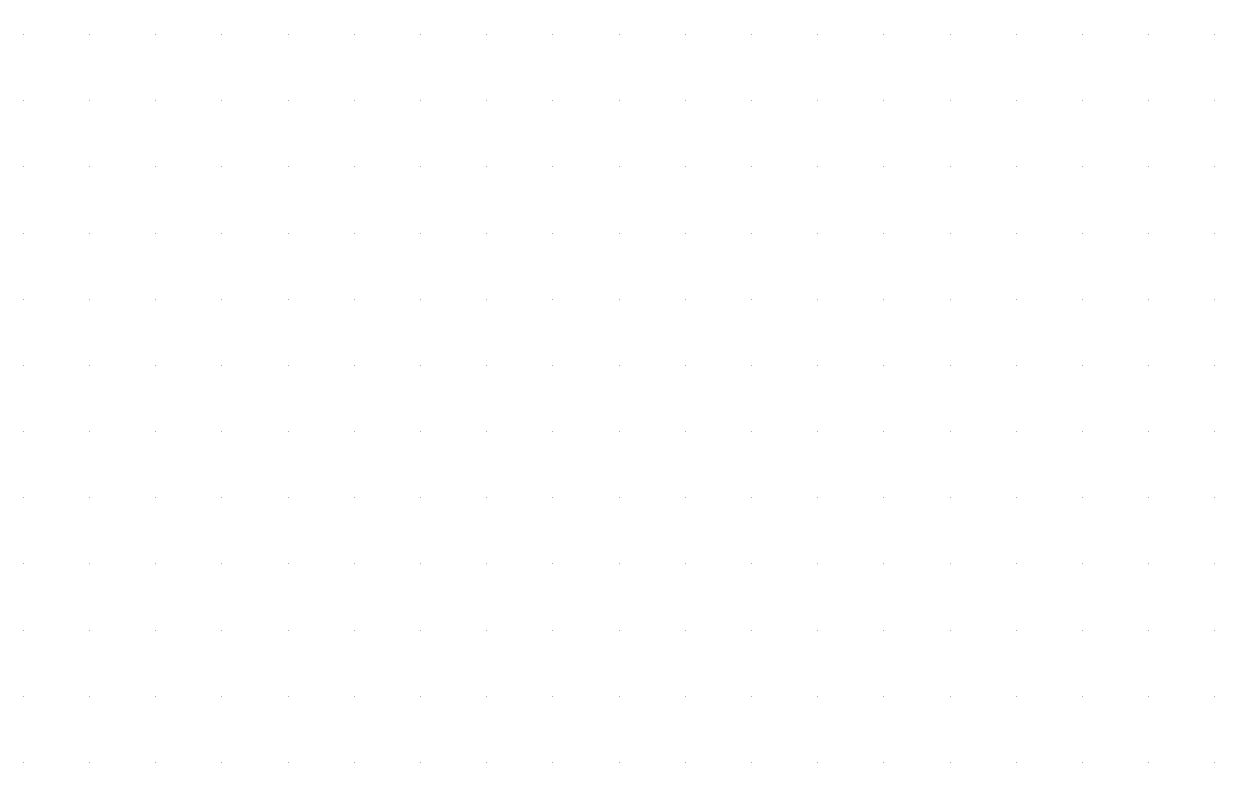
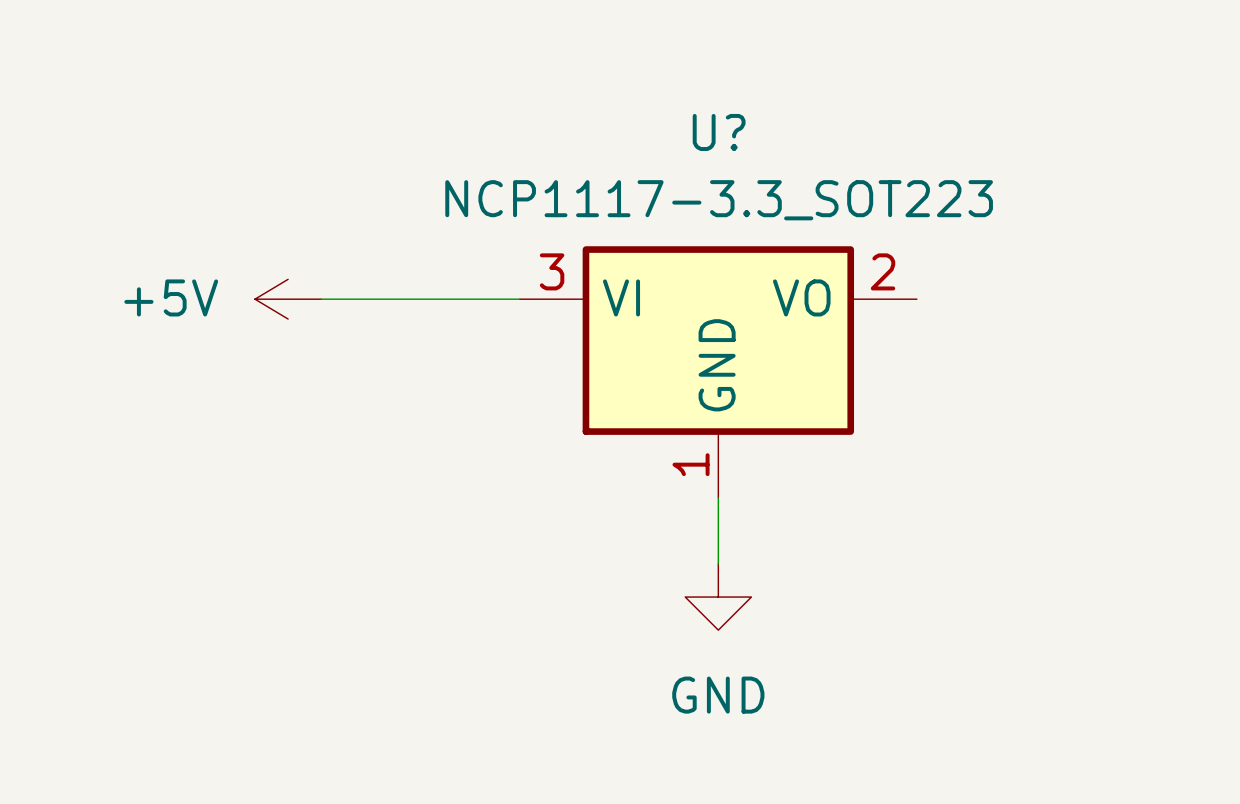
power symbol: none -> +5V (288, 299)
wire: none -> (321, 299) (519, 299)
U?: none -> NCP1117-3.3_SOT223 (718, 372)
wire: none -> (718, 497) (718, 563)
power symbol: none -> GND (718, 597)

